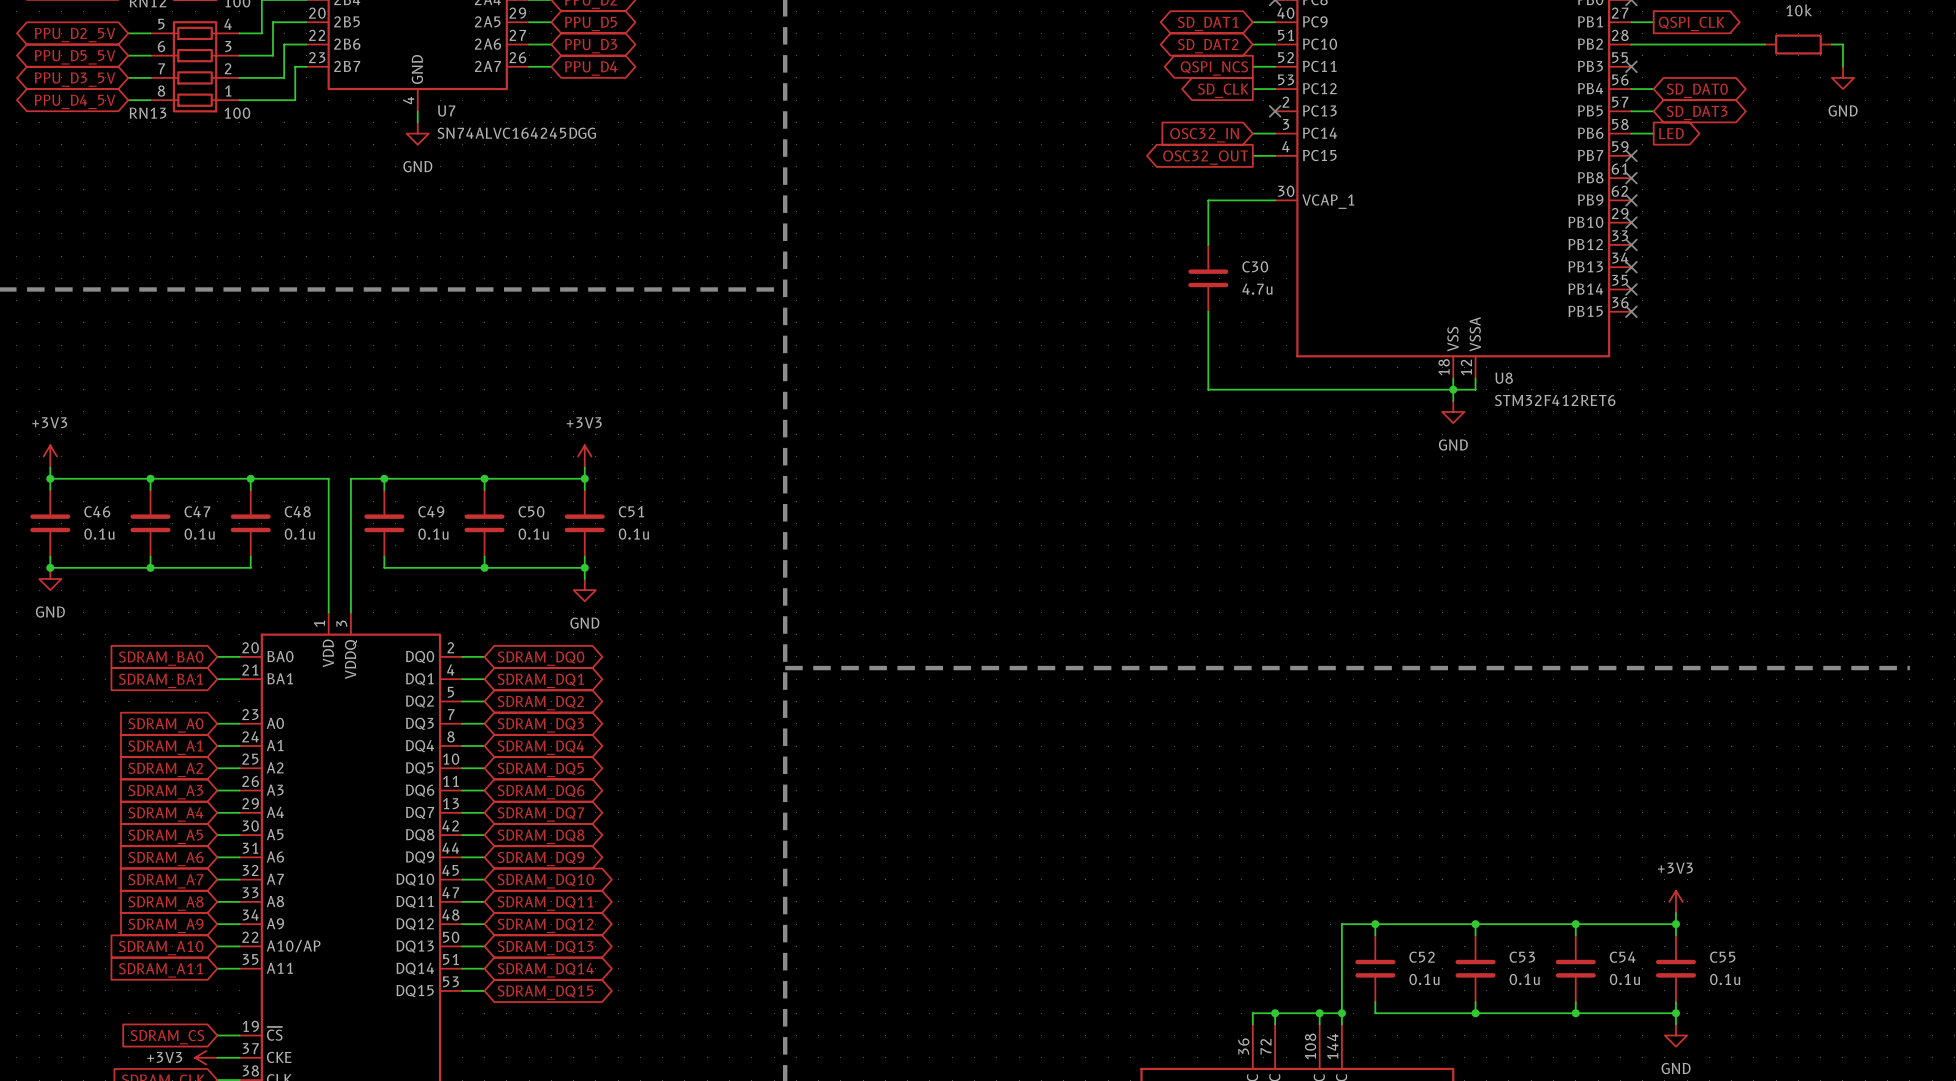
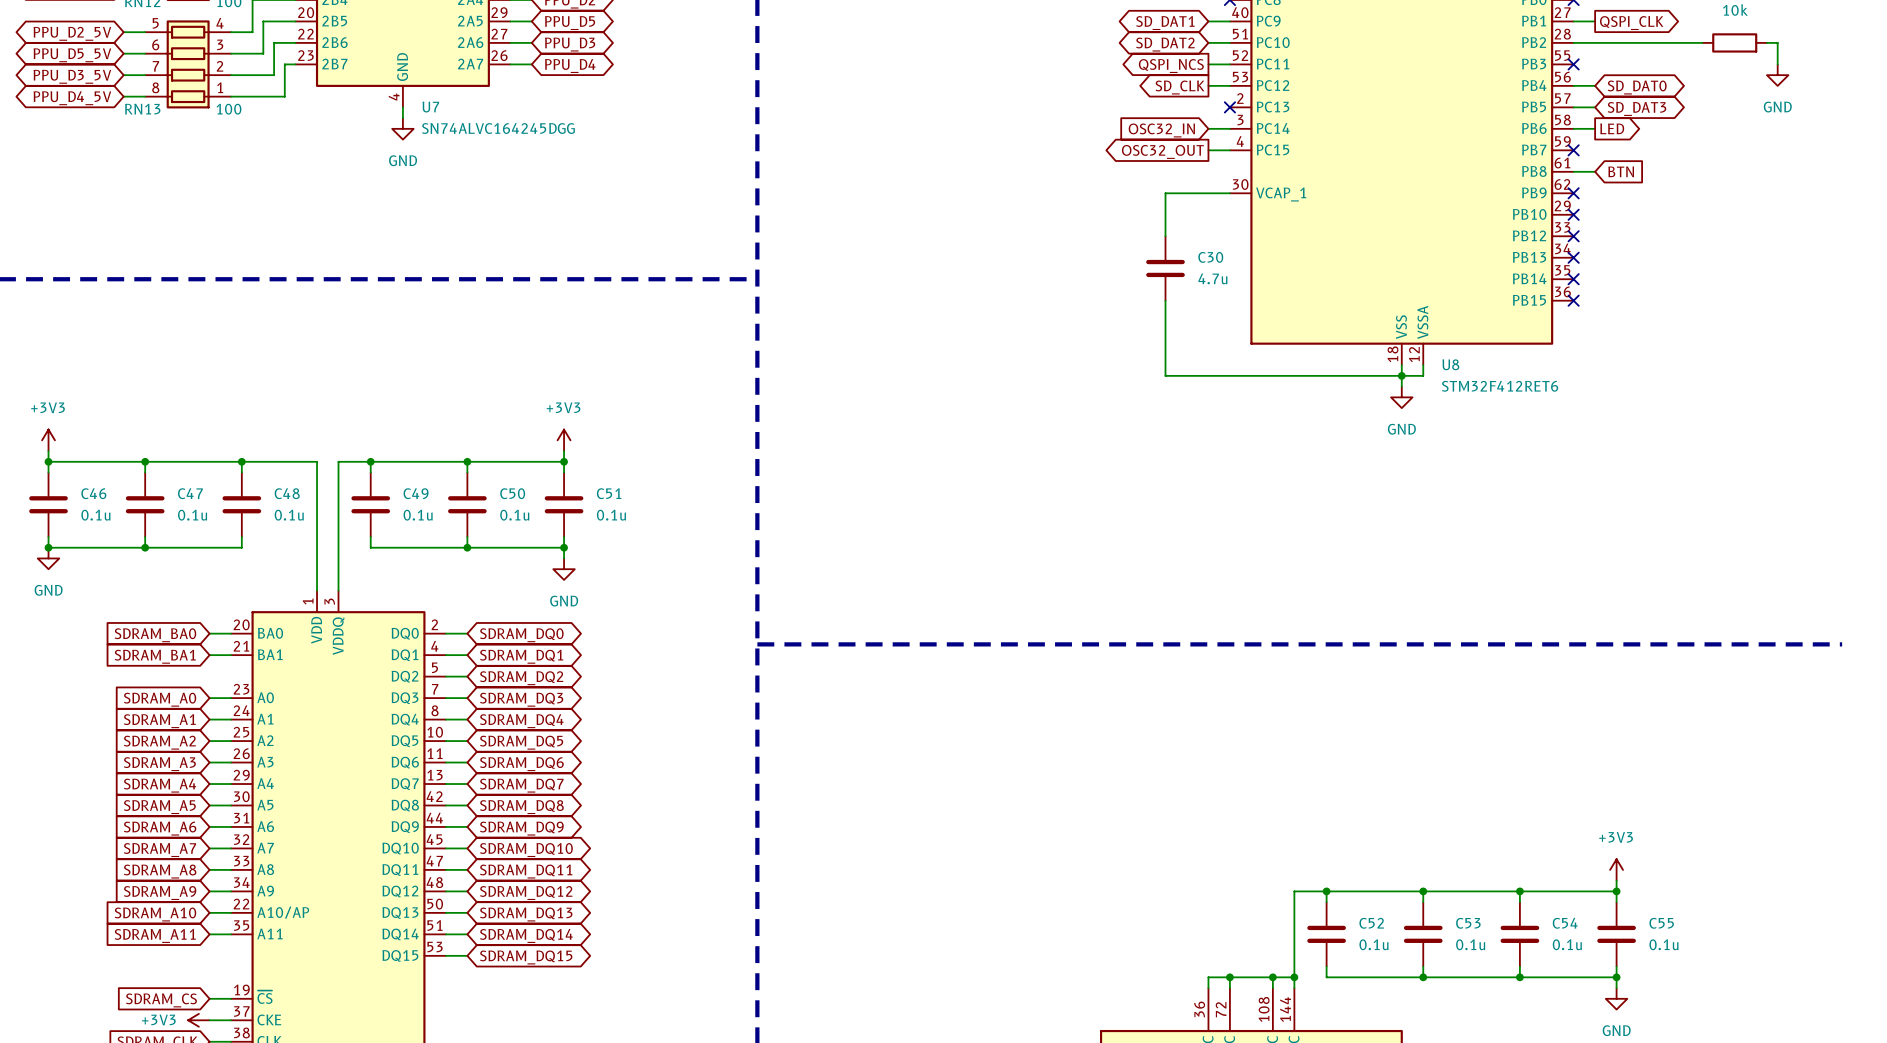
wire: none -> (1573, 171) (1595, 171)
no-connect mark: (1631, 178) -> none
global label: none -> BTN (1621, 171)

